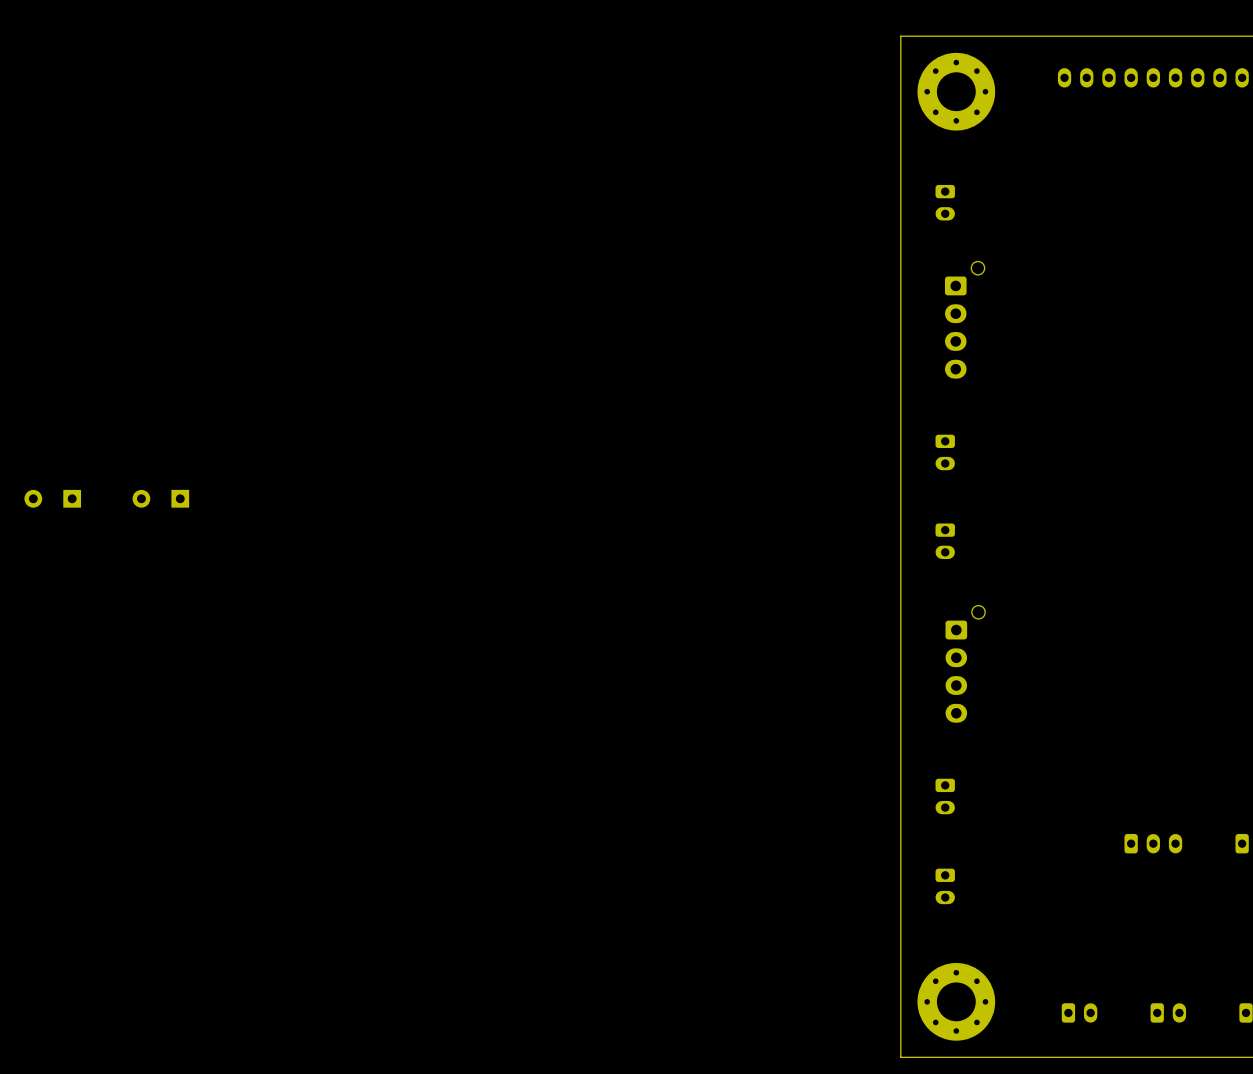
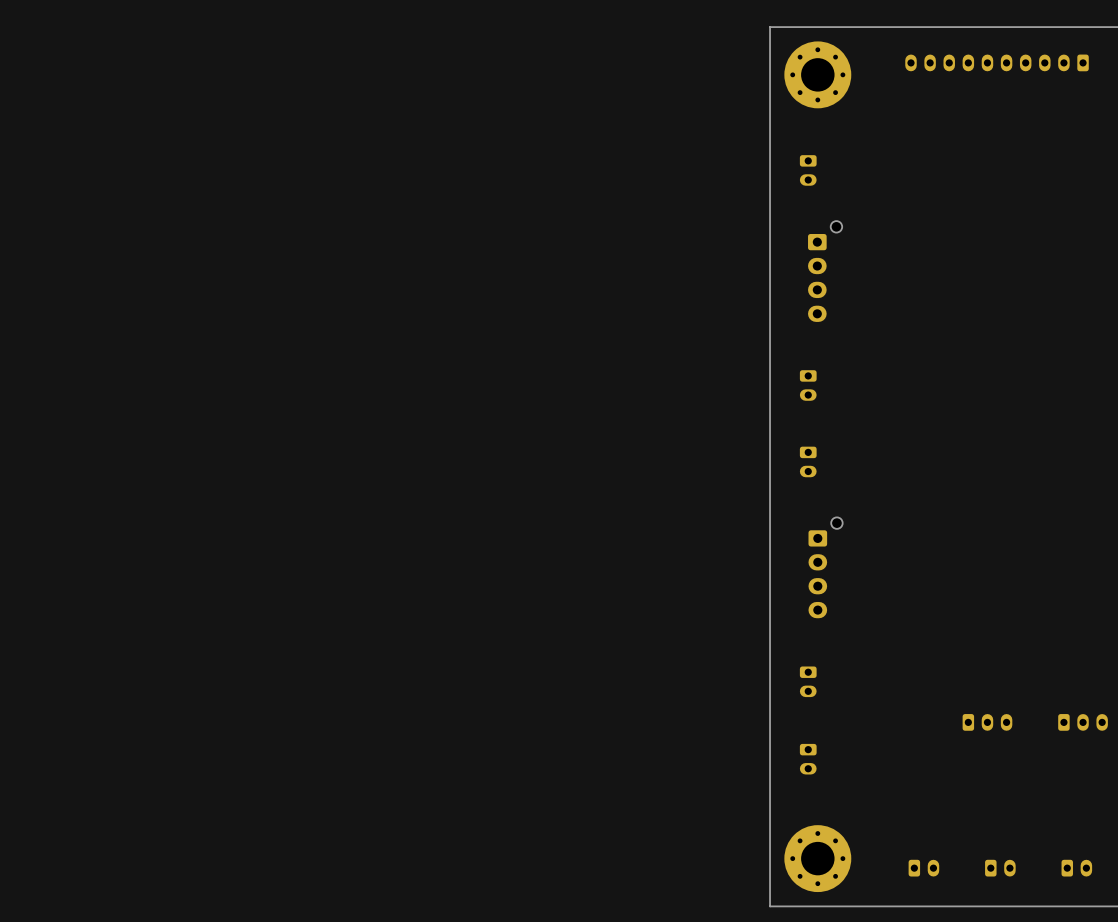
part: (52, 498) -> none
part: (160, 498) -> none

